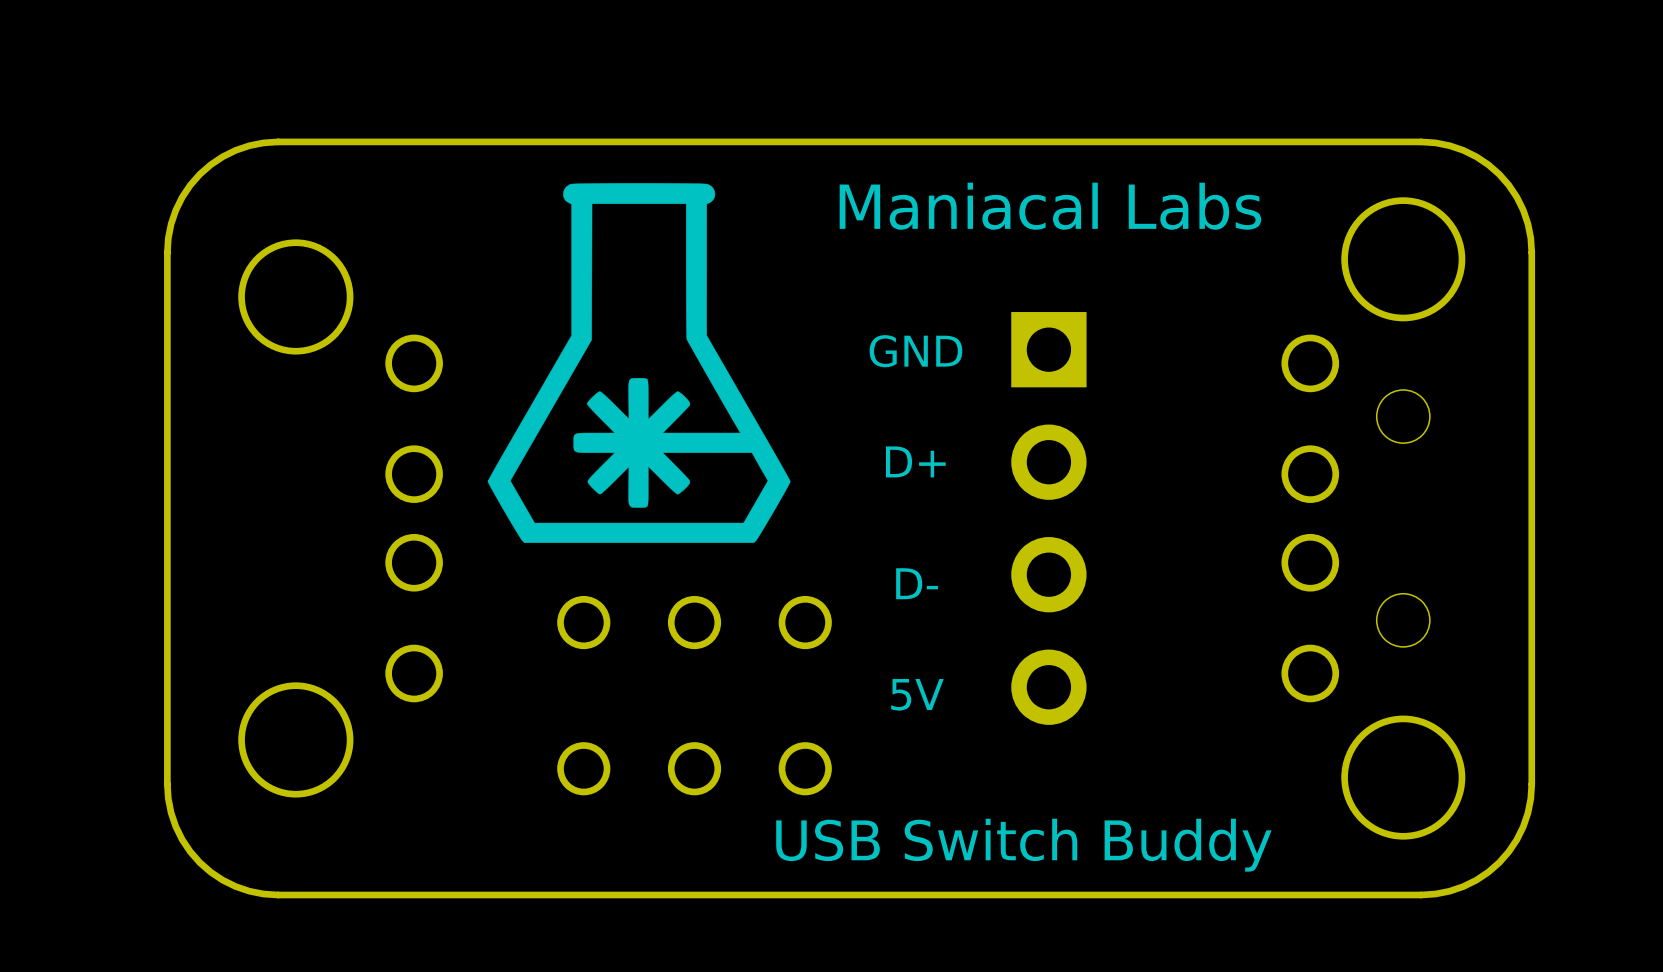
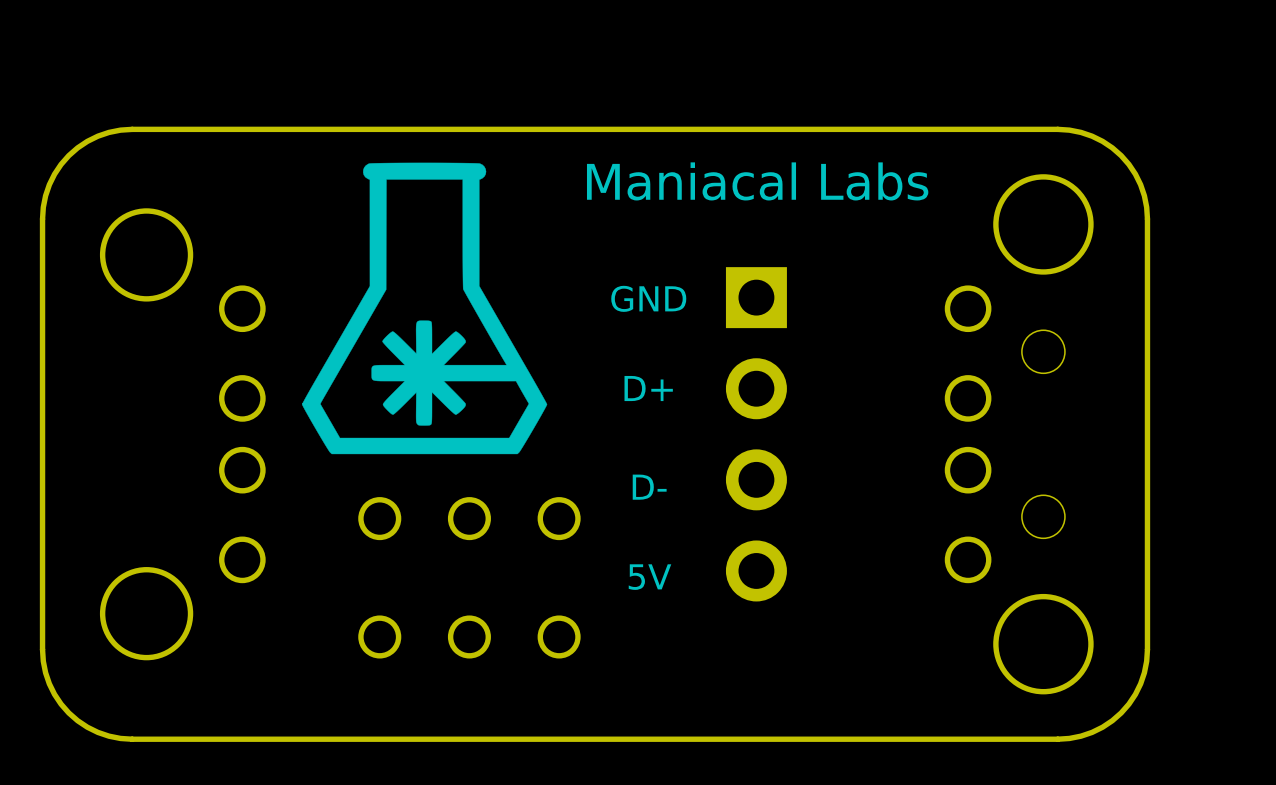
text: USB Switch Buddy (1023, 845) -> none

